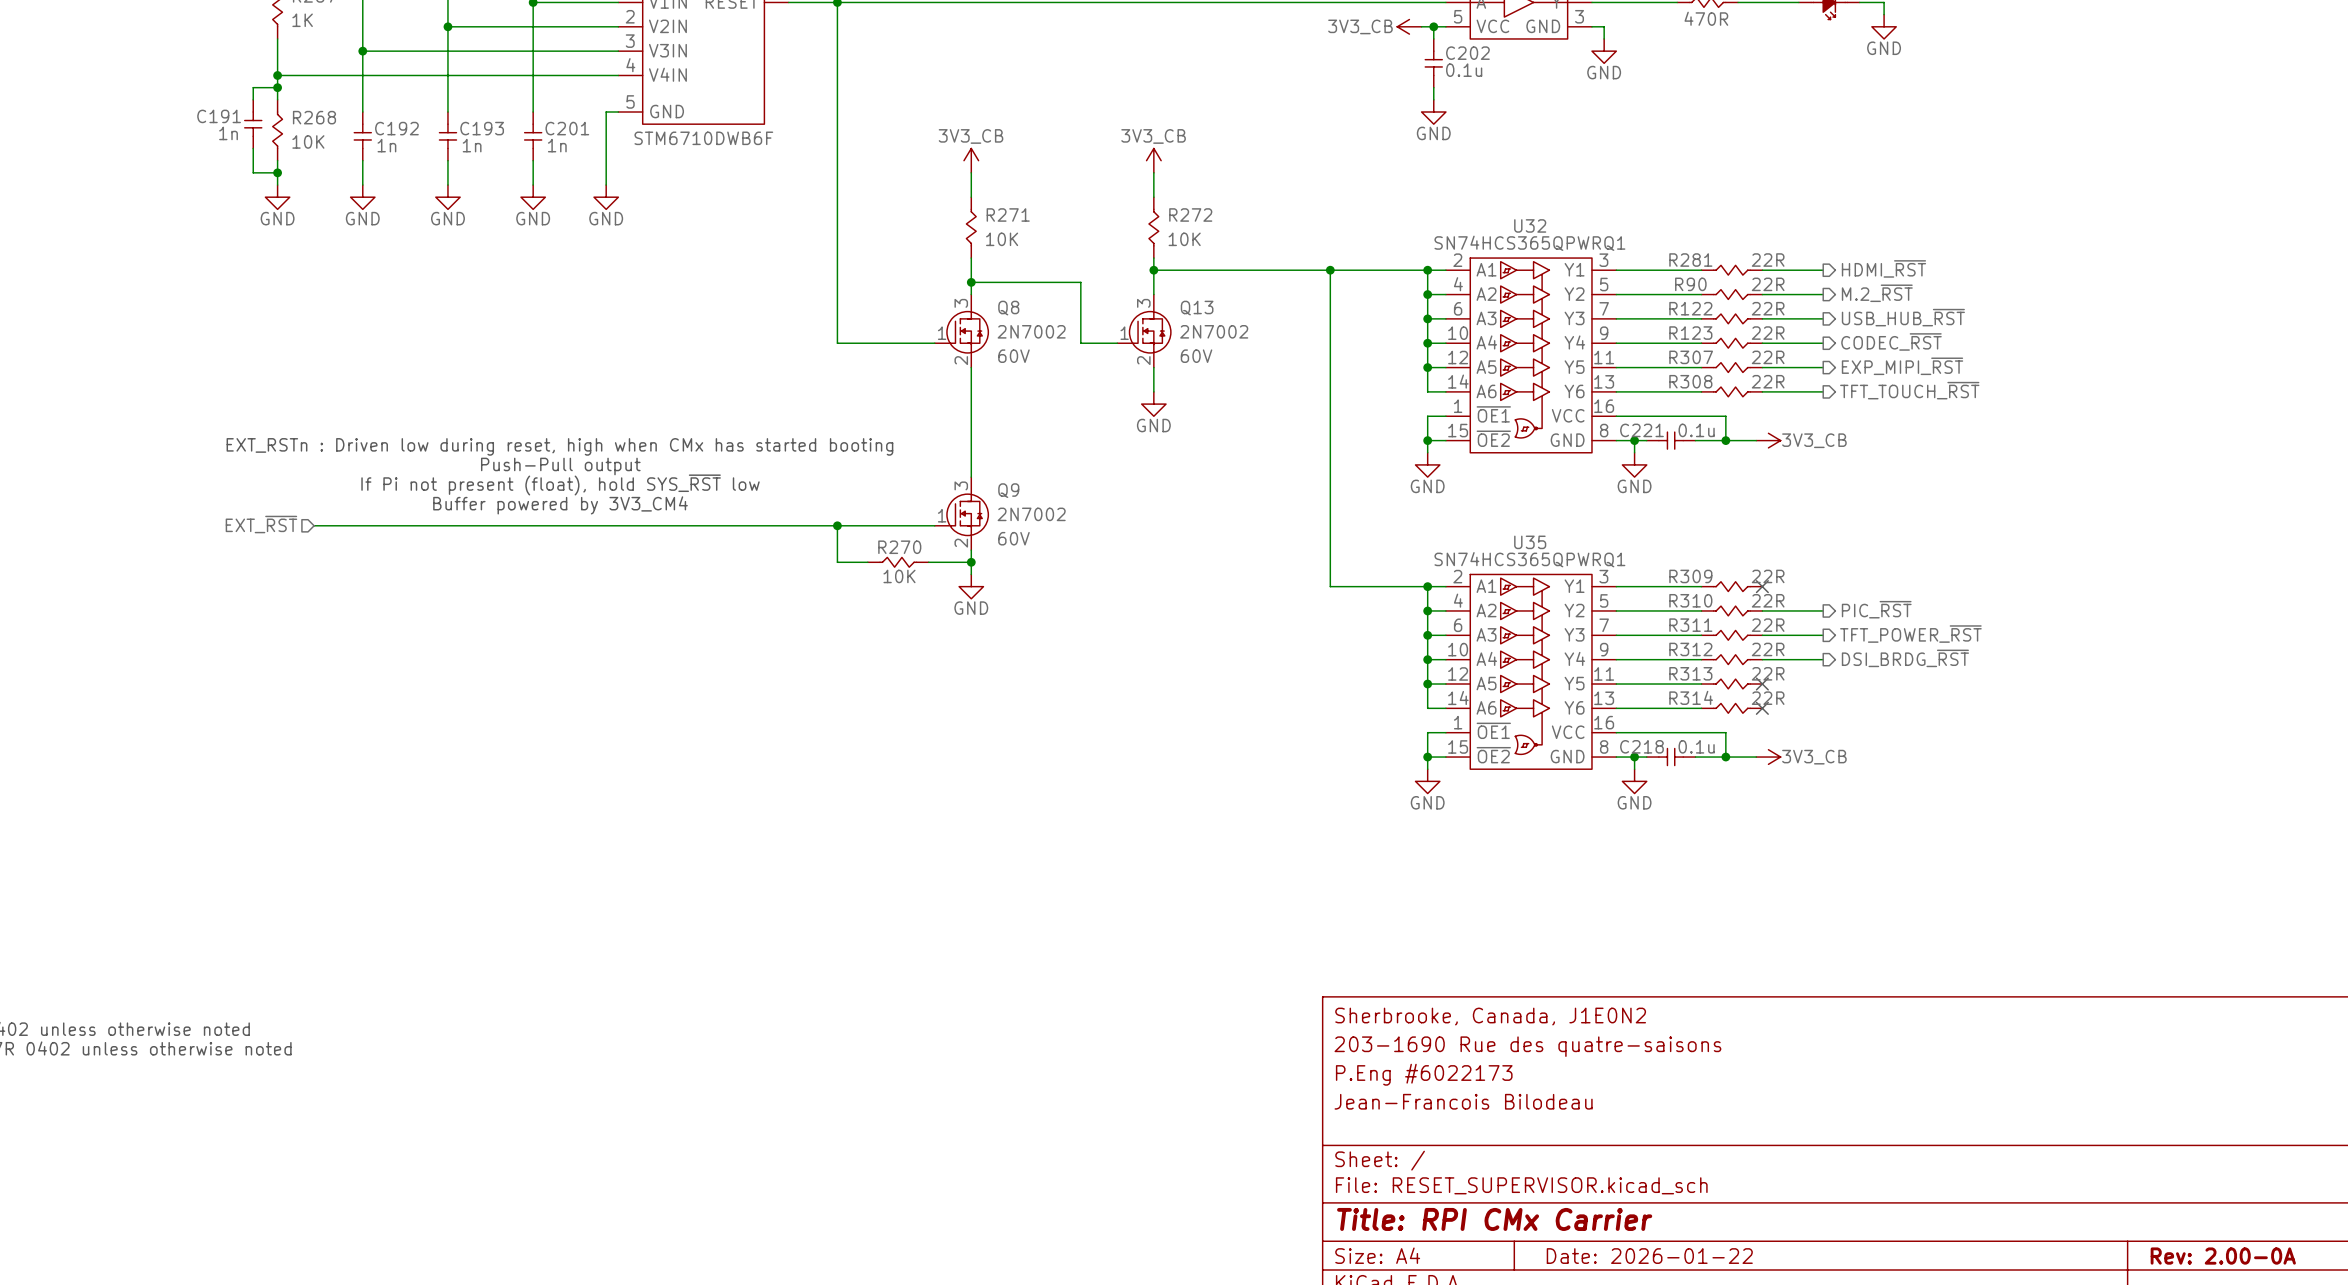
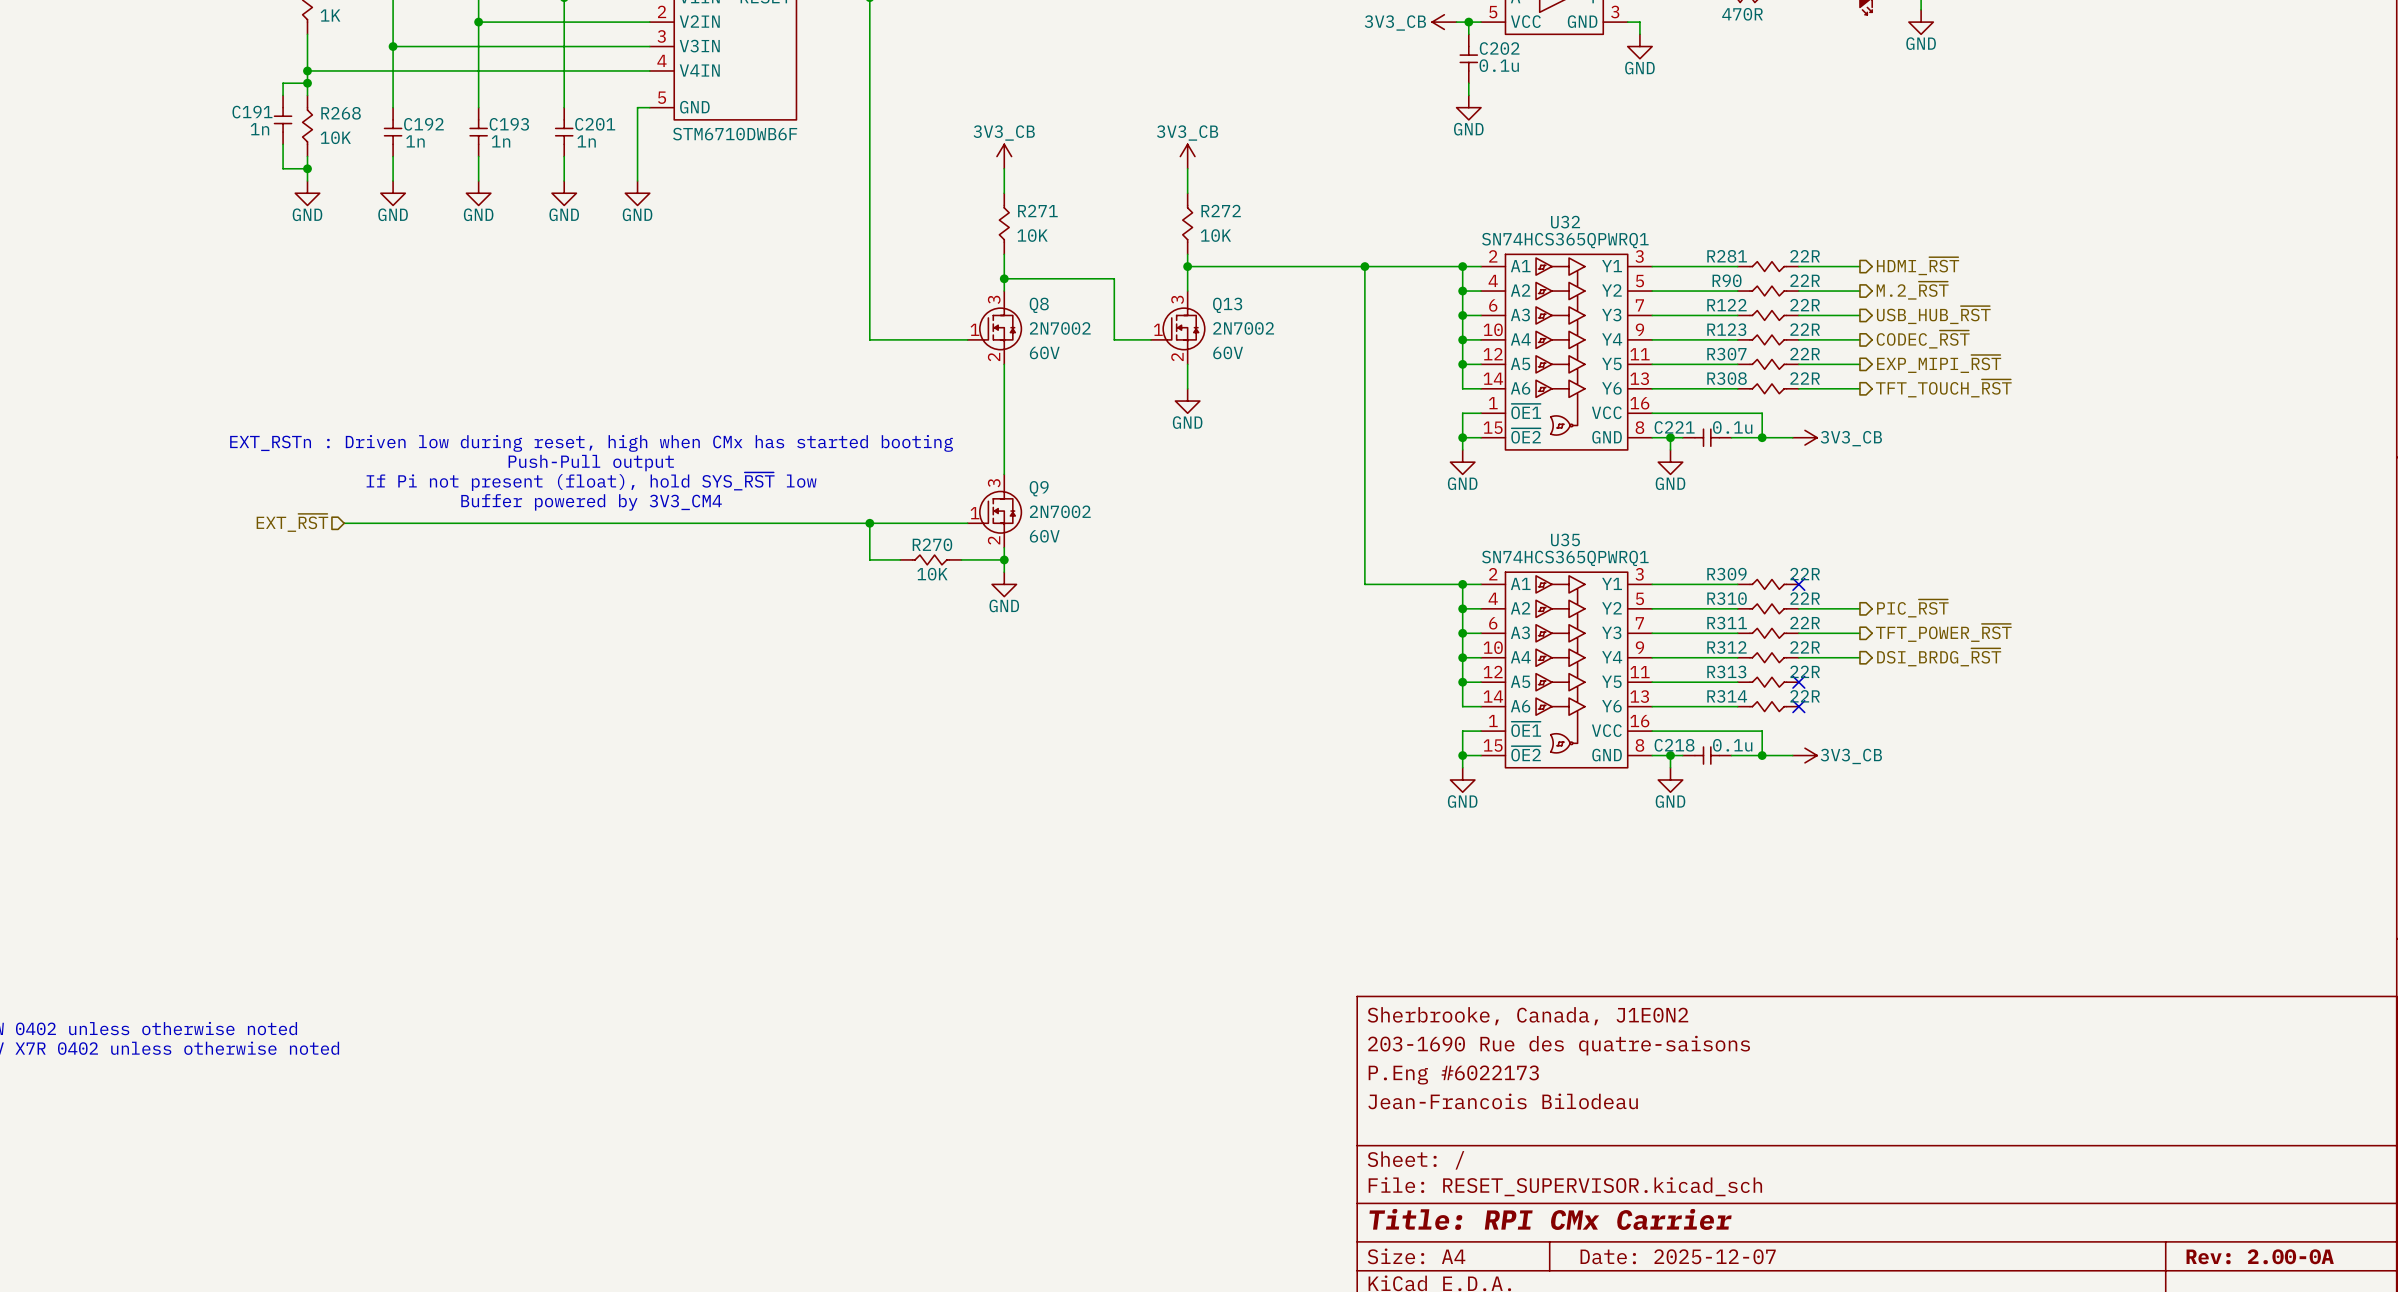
title block: Date: 2026-01-22 (1649, 1256) -> Date: 2025-12-07 (1678, 1256)

